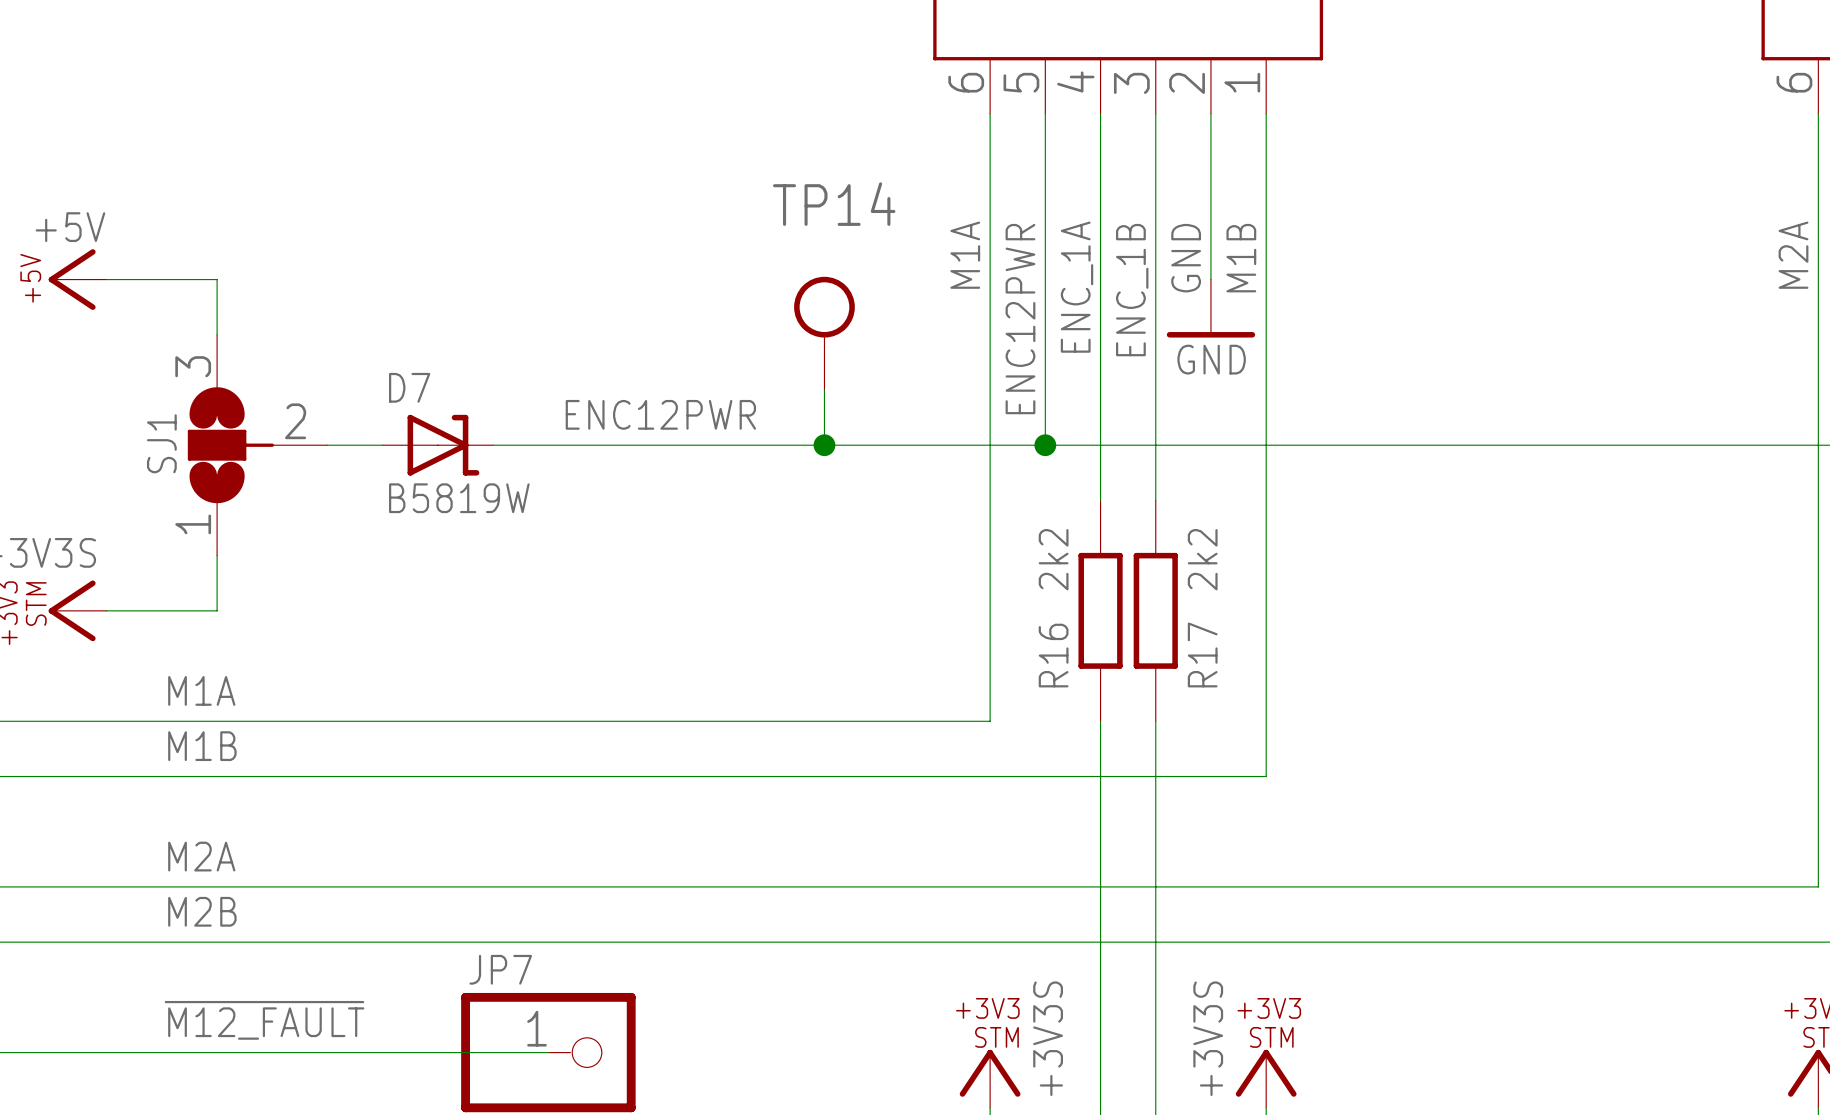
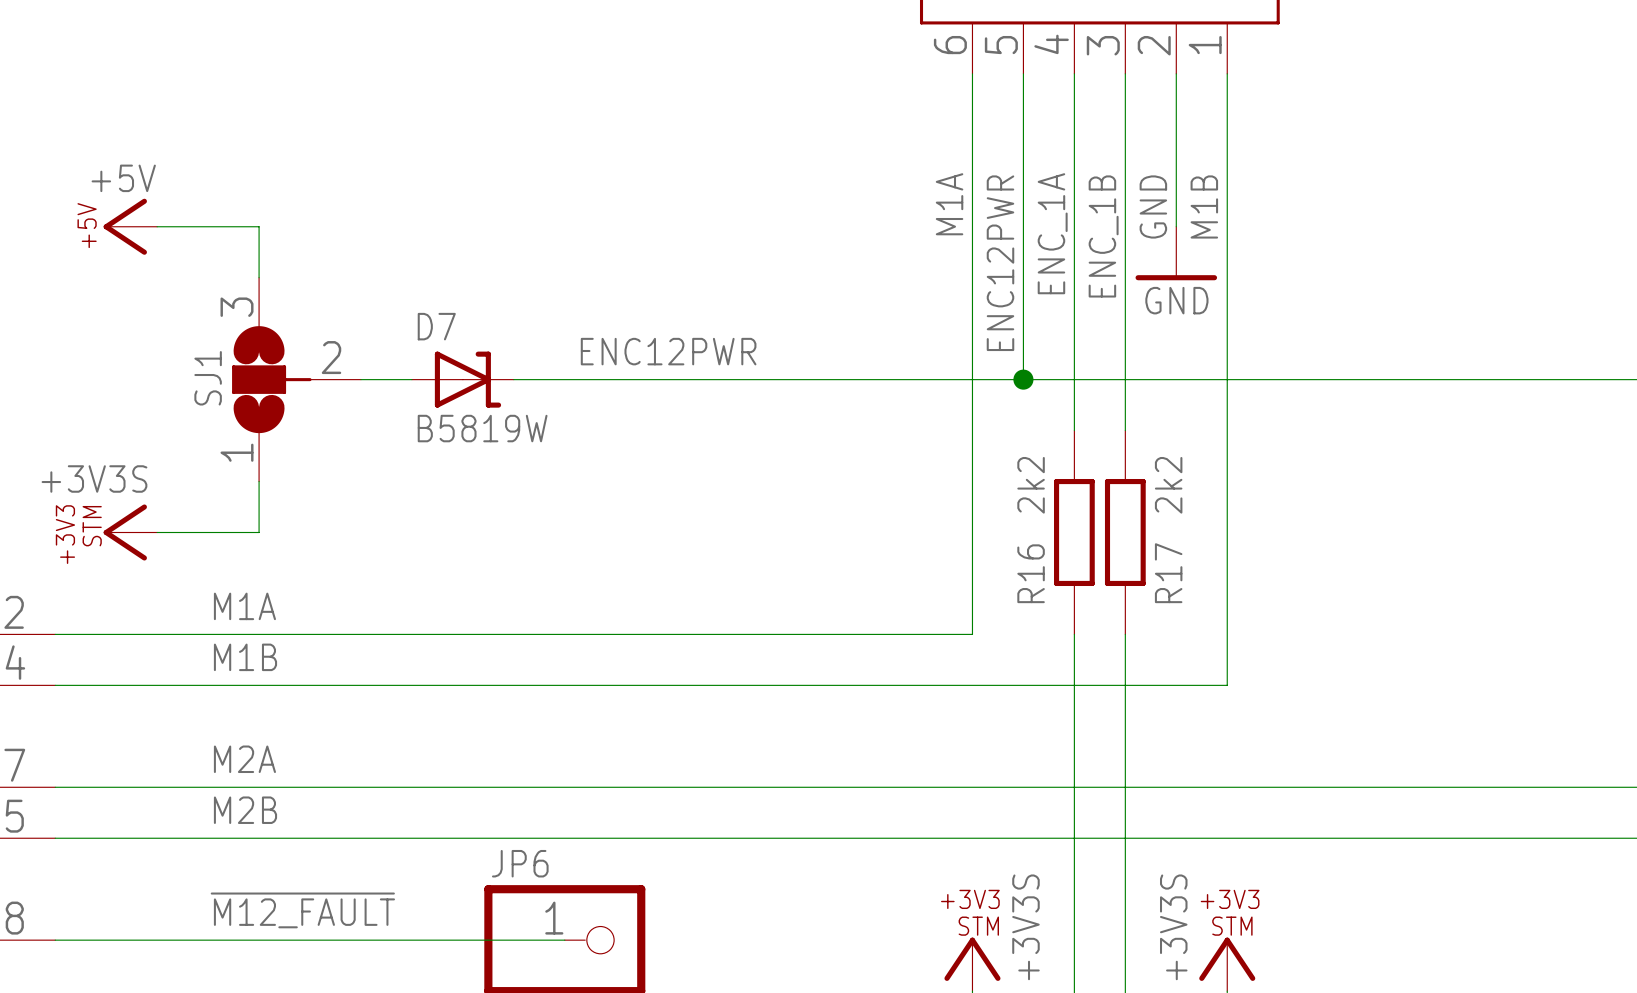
TP14: (824, 333) -> none
wire: (824, 390) (824, 445) -> none
junction: (824, 445) -> none
JP7 name: JP7 (500, 969) -> JP6 (520, 863)

